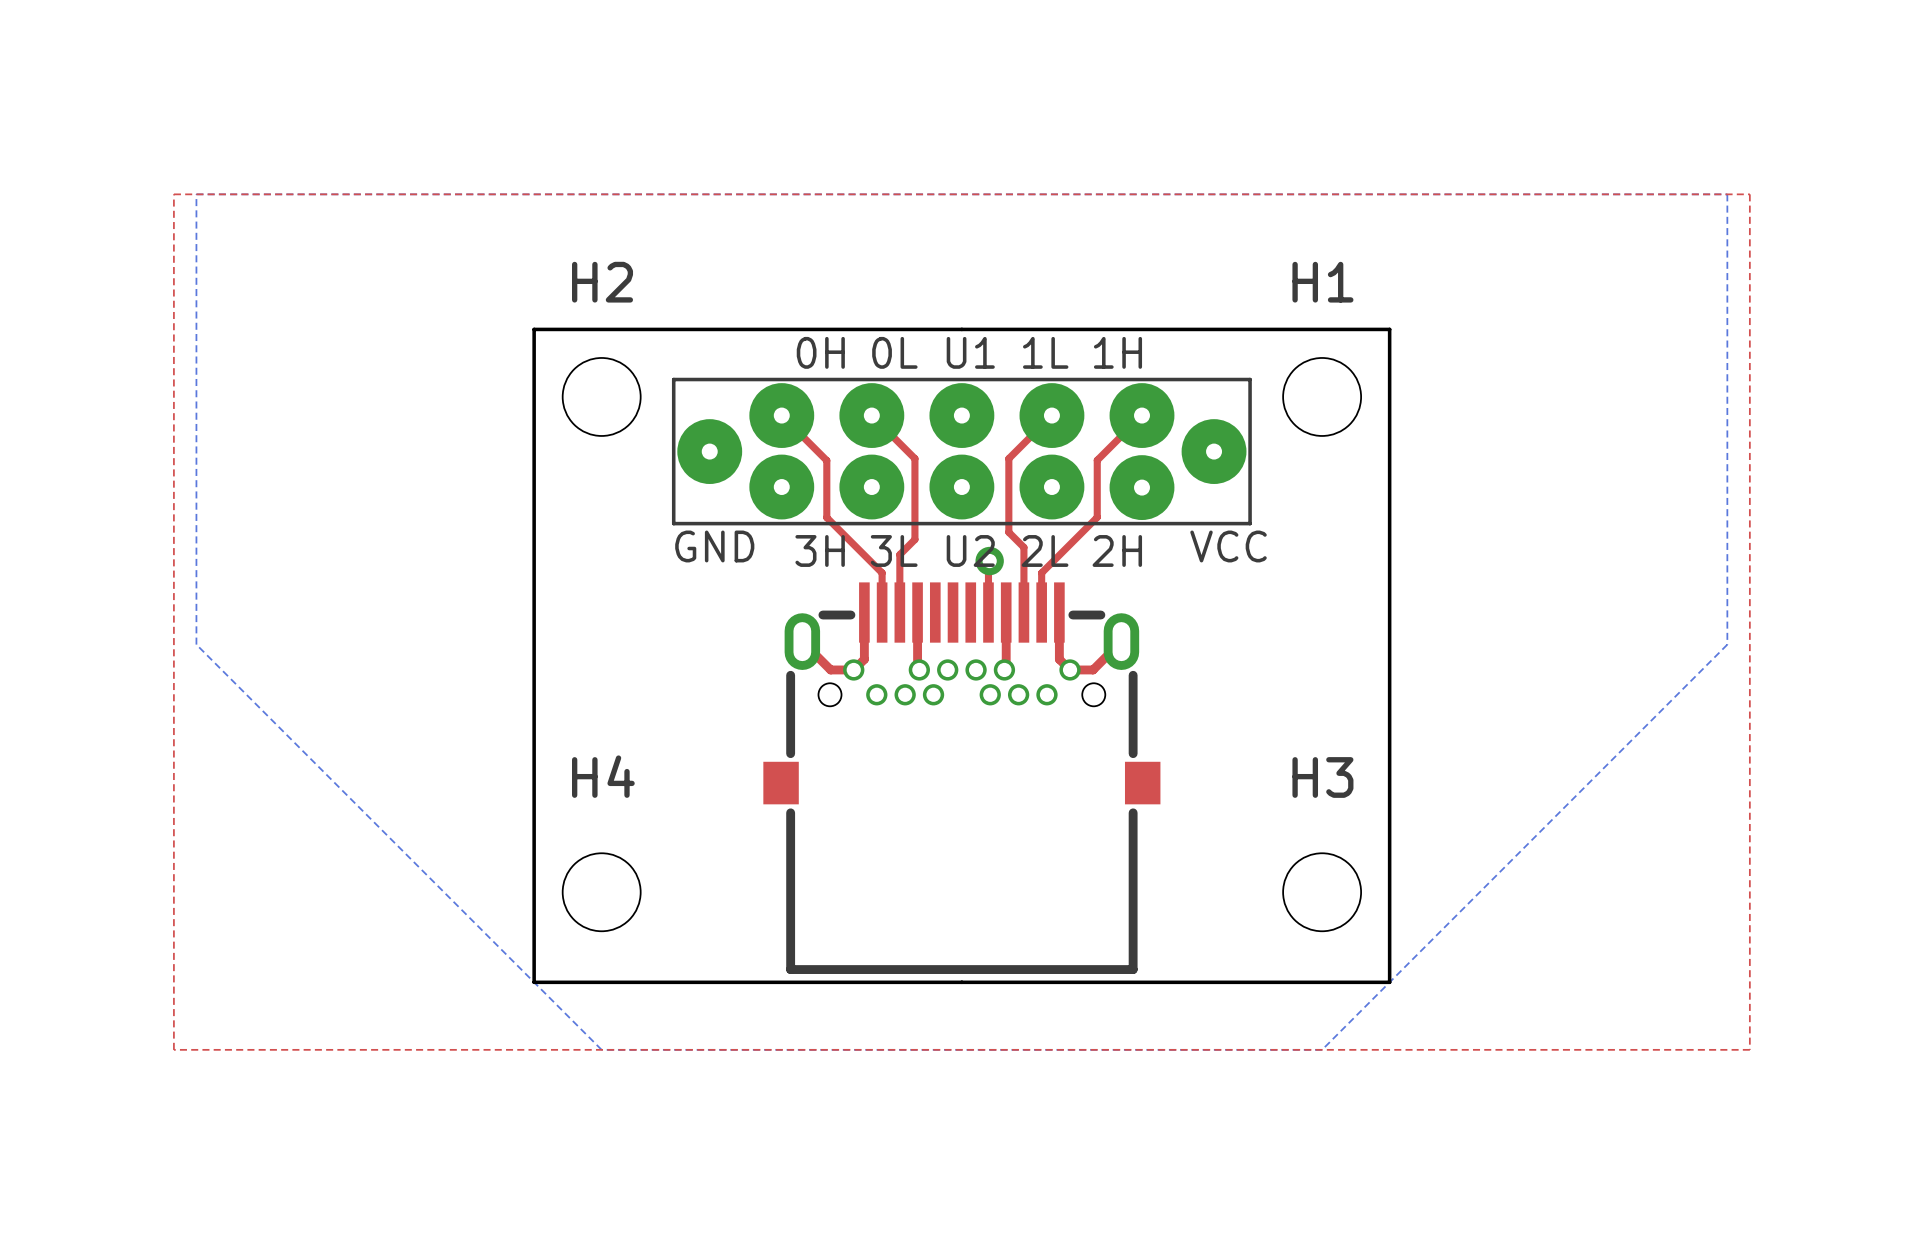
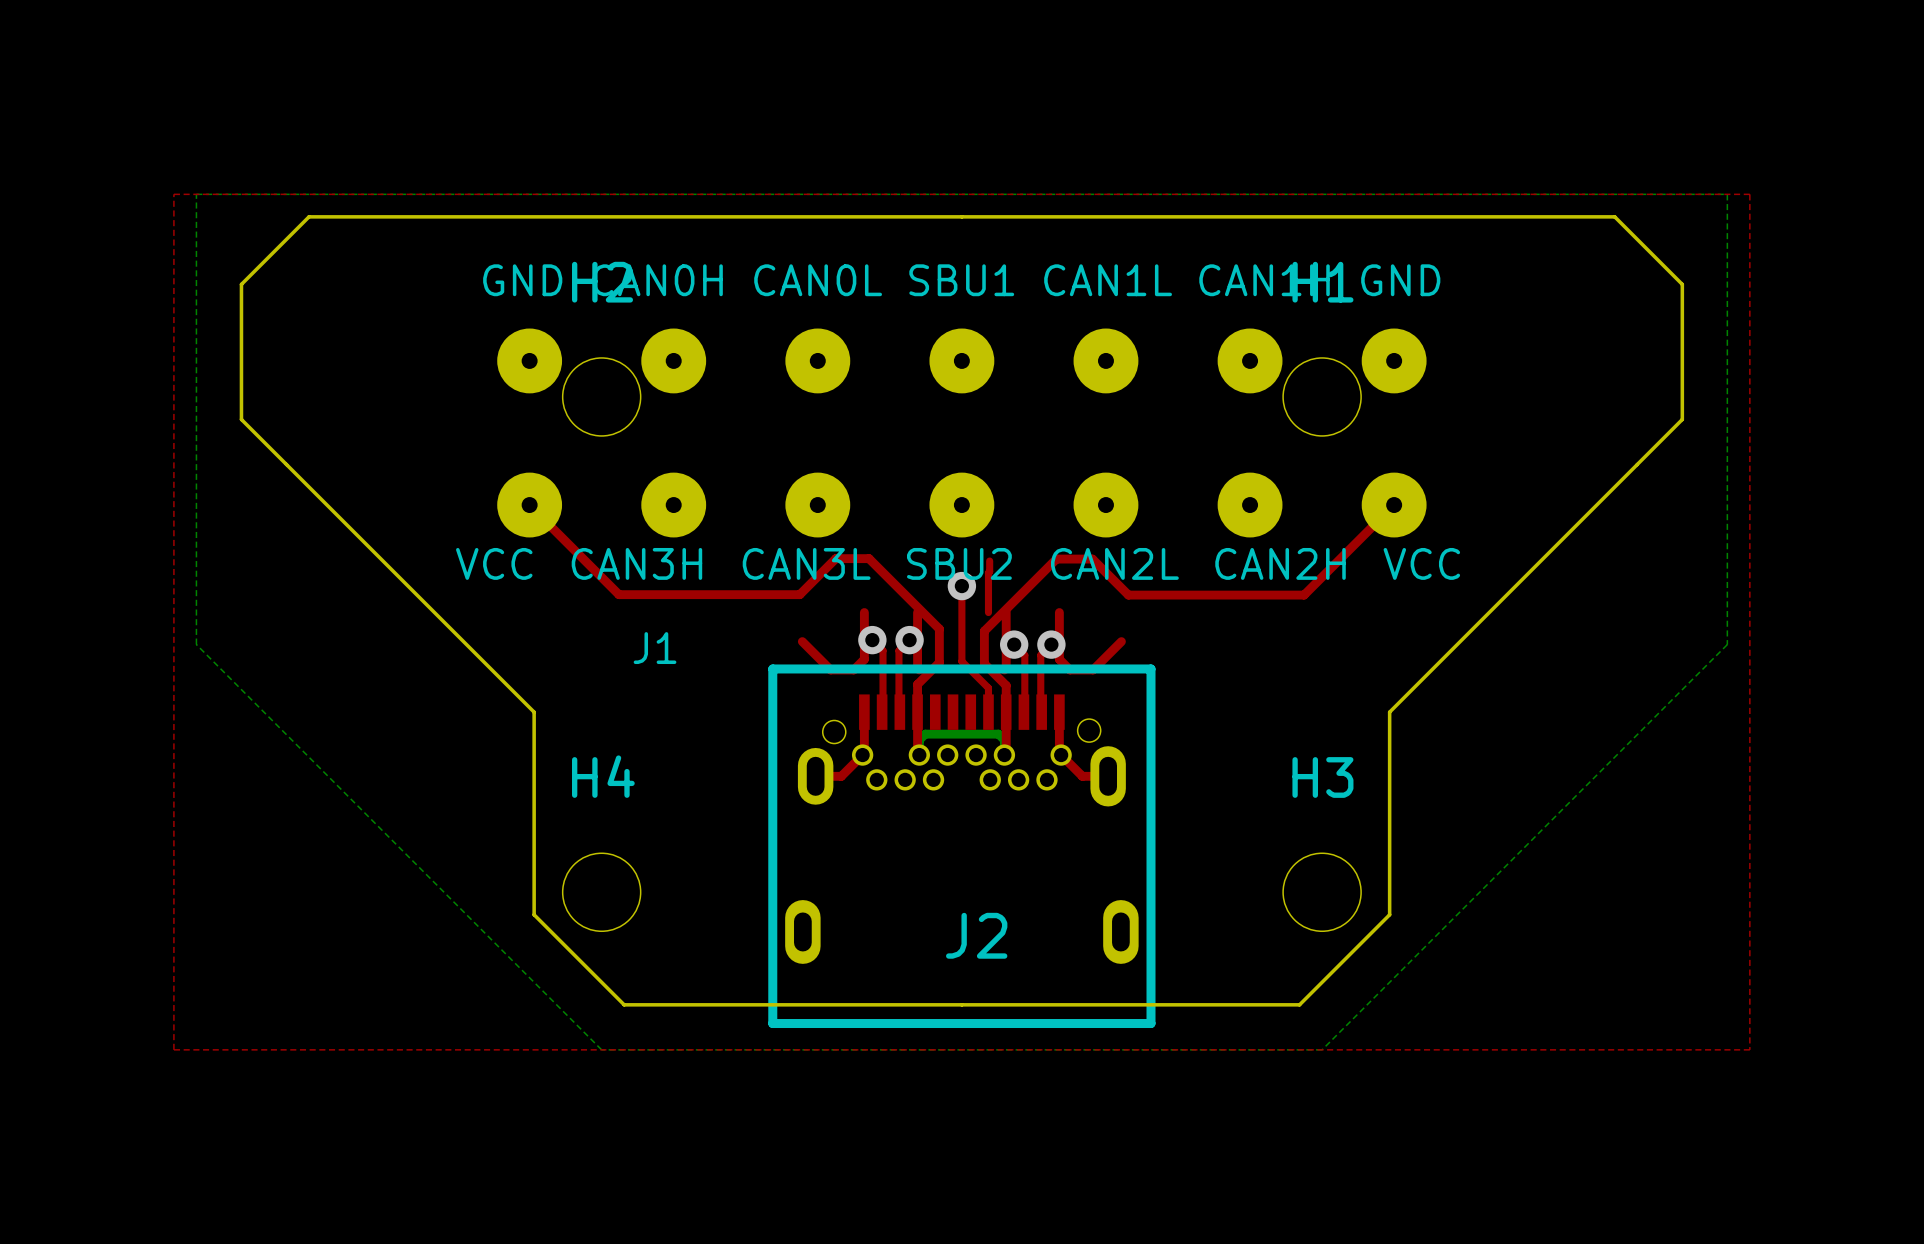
text: none -> GND (1400, 280)
top track: (781, 415) (826, 460) (826, 517) (882, 572) (882, 612) -> none
top track: (871, 415) (914, 458) (914, 539) (899, 554) (899, 612) -> none
top track: (1051, 415) (1008, 458) (1008, 532) (1023, 547) (1023, 612) -> none
top track: (1141, 415) (1097, 460) (1097, 517) (1041, 572) (1041, 612) -> none
J1: none -> (961, 432)
part: (961, 451) -> none
top track: none -> (528, 504) (618, 594) (799, 594) (835, 558) (869, 558) (939, 629) (939, 662) (917, 684) (917, 753) (919, 755)
top track: none -> (1394, 505) (1304, 595) (1128, 595) (1092, 559) (1056, 559) (984, 631) (984, 663) (1006, 685) (1006, 753) (1004, 755)
via position: (989, 561) -> (961, 586)
text: none -> VCC (494, 563)
top track: none -> (961, 586) (961, 661) (988, 688) (988, 712)
top track: none -> (872, 640) (883, 650) (882, 712)
via: none -> (872, 640)
top track: none -> (909, 640) (898, 650) (899, 712)
via: none -> (909, 640)
top track: none -> (1014, 644) (1024, 655) (1023, 712)
via: none -> (1014, 644)
top track: none -> (1051, 644) (1040, 655) (1041, 712)
via: none -> (1051, 644)
board edge: (534, 712) (534, 329) (1389, 329) (1389, 712) -> (534, 712) (241, 419) (241, 284) (309, 216) (1614, 216) (1682, 284) (1682, 419) (1389, 712)
top track: none -> (864, 712) (864, 753) (841, 776) (815, 776)
top track: none -> (1059, 712) (1059, 753) (1082, 776) (1108, 776)
bottom track: none -> (919, 755) (919, 740) (925, 734) (998, 734) (1004, 740) (1004, 755)
part: (961, 778) -> none
J2: none -> (961, 846)
board edge: (534, 914) (534, 982) (1389, 982) (1389, 914) -> (534, 914) (624, 1004) (1299, 1004) (1389, 914)

